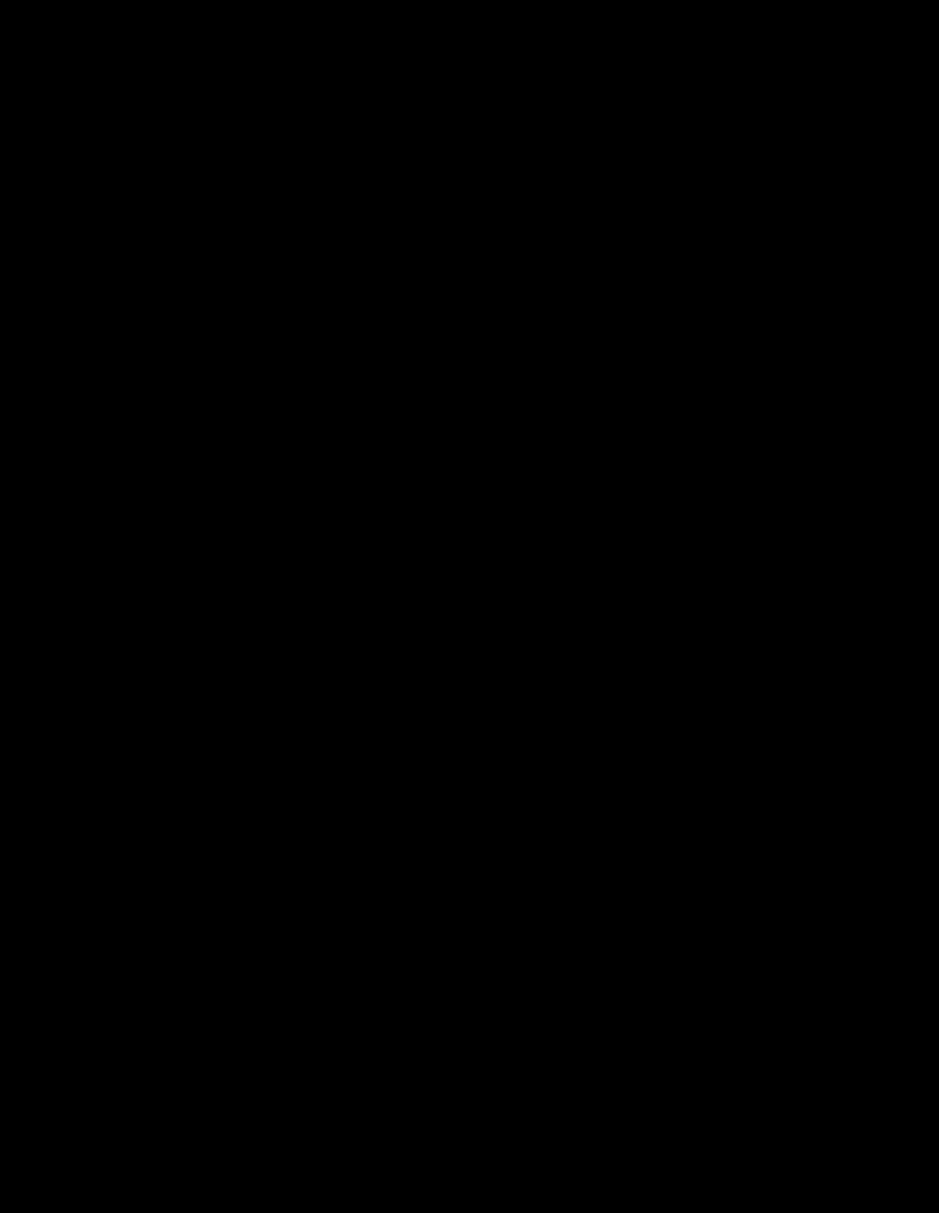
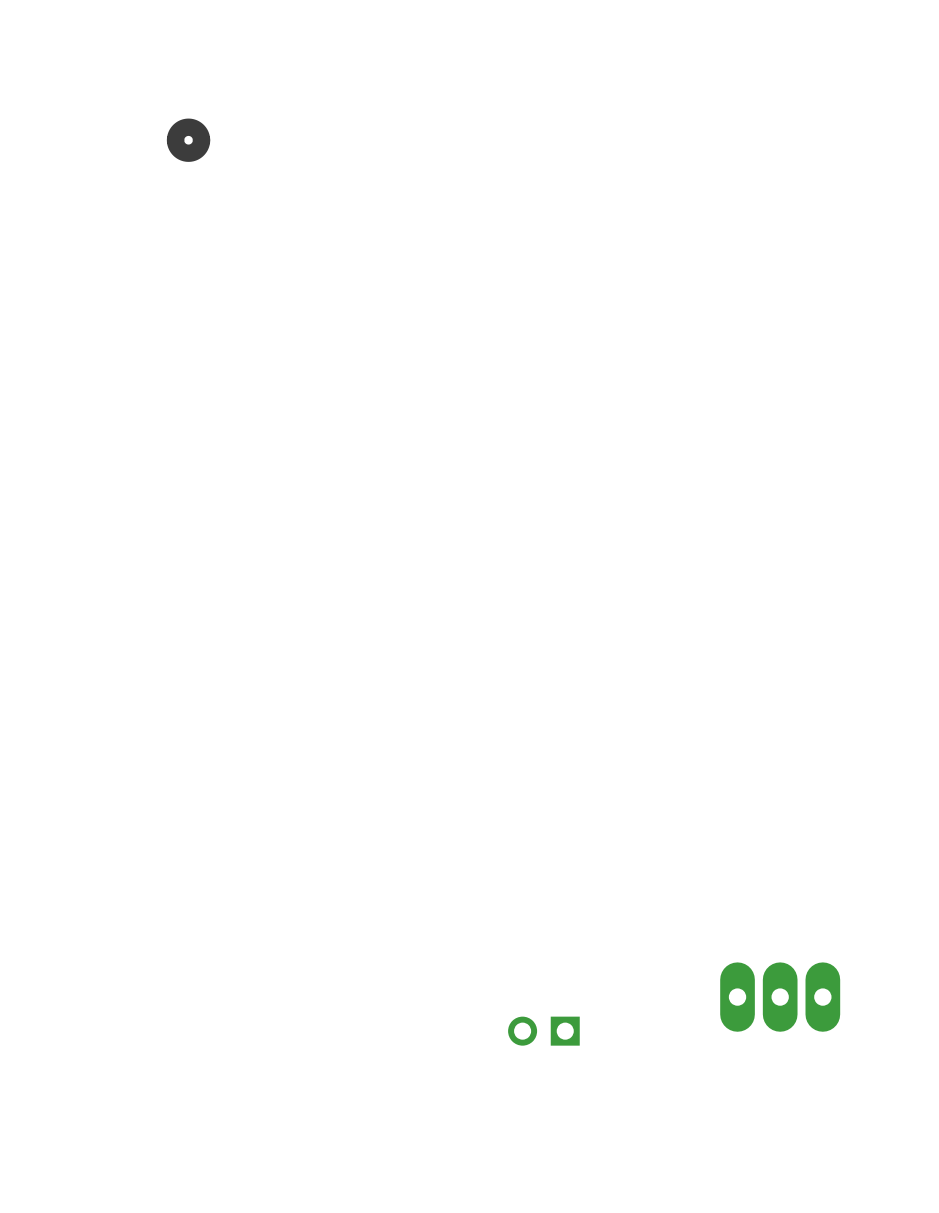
part: none -> (188, 140)
part: none -> (780, 997)
part: none -> (543, 1031)

